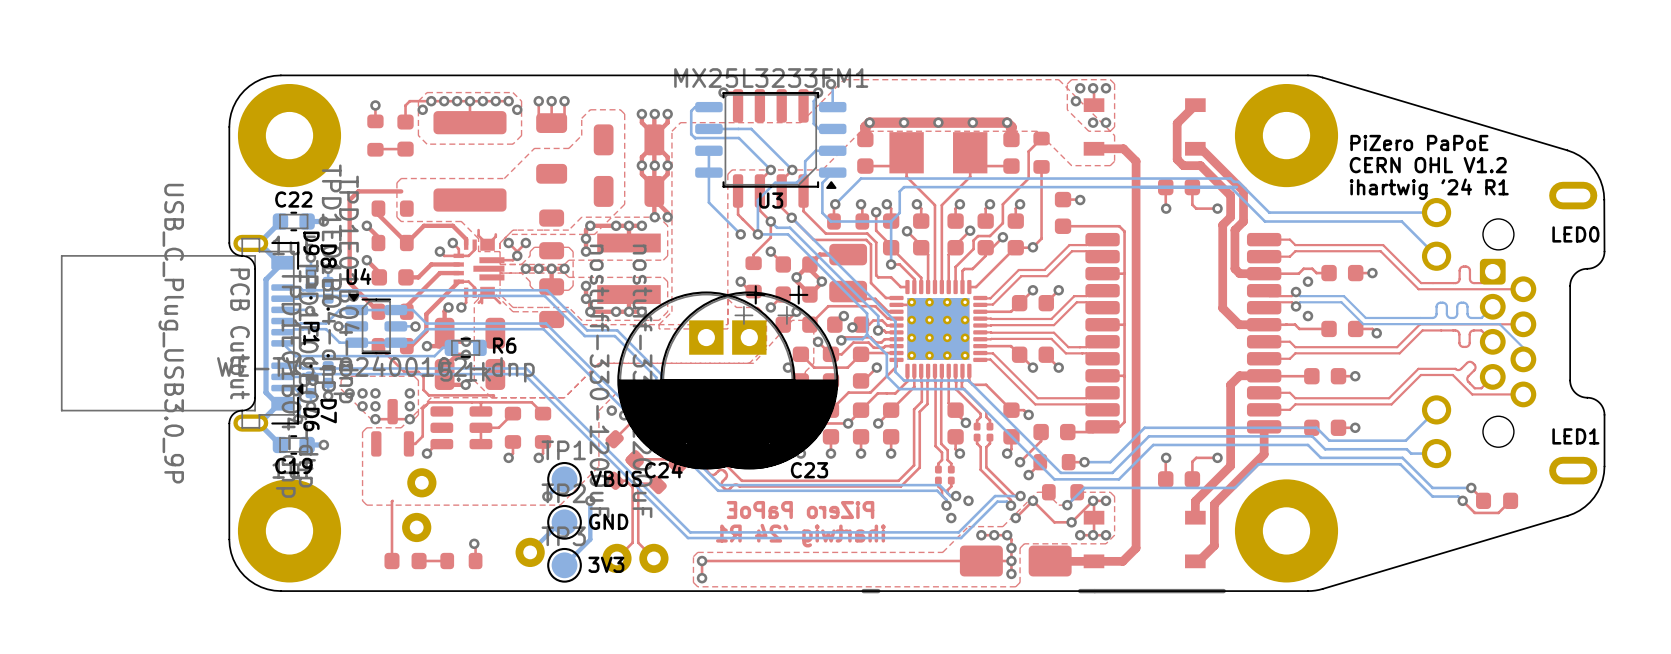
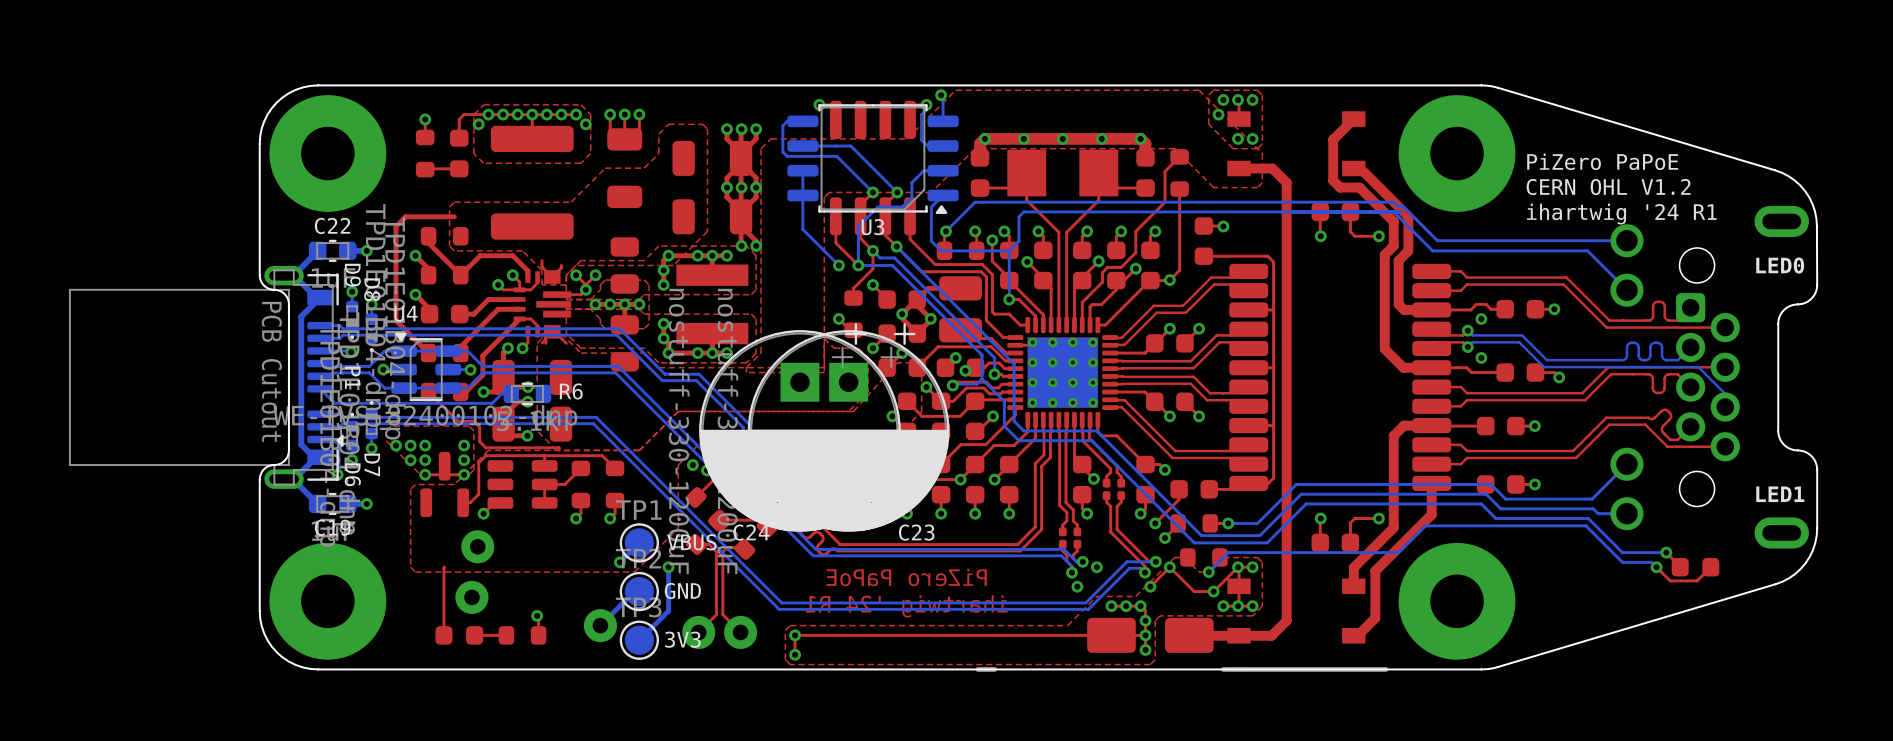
U3 value: MX25L3233FM1 (771, 78) -> none
P1 value: USB_C_Plug_USB3.0_9P (171, 333) -> none

